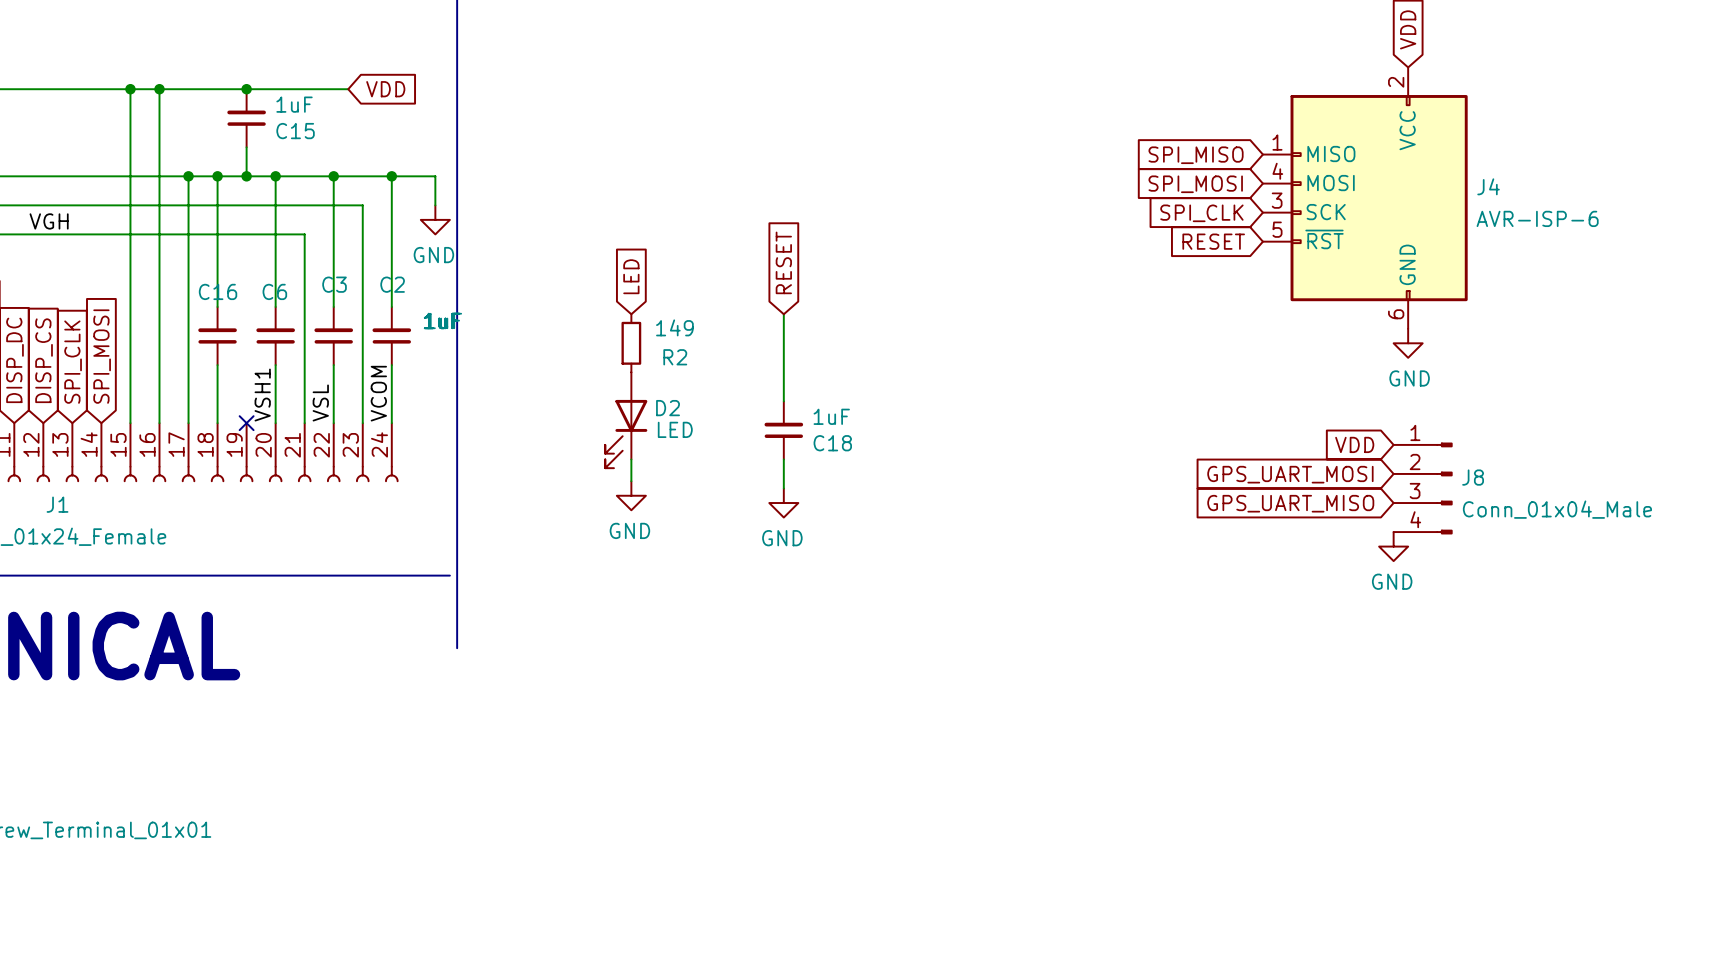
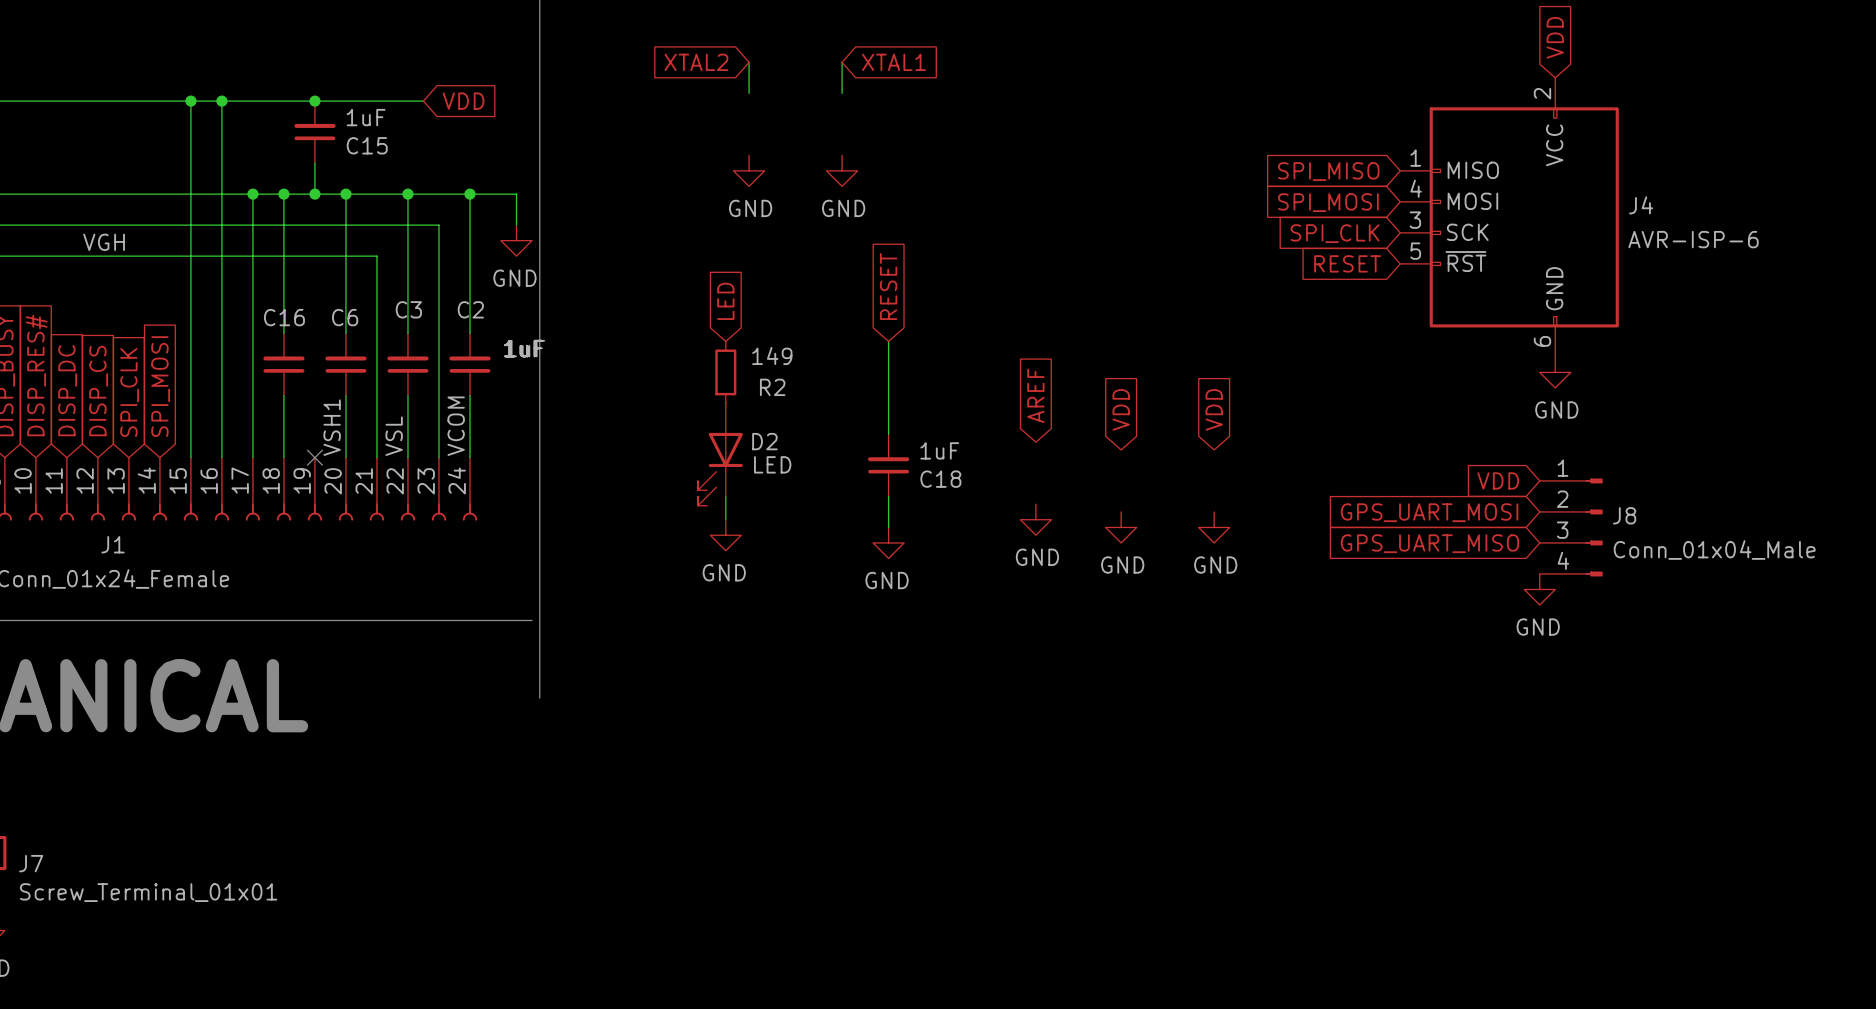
global label: none -> XTAL2 (696, 62)
wire: none -> (749, 62) (749, 93)
wire: none -> (842, 62) (842, 93)
global label: none -> XTAL1 (893, 62)
power symbol: none -> GND (749, 170)
power symbol: none -> GND (842, 170)
global label: none -> AREF (1035, 395)
global label: none -> VDD (1121, 409)
global label: none -> VDD (1214, 409)
power symbol: none -> GND (1035, 519)
power symbol: none -> GND (1121, 527)
power symbol: none -> GND (1214, 527)

